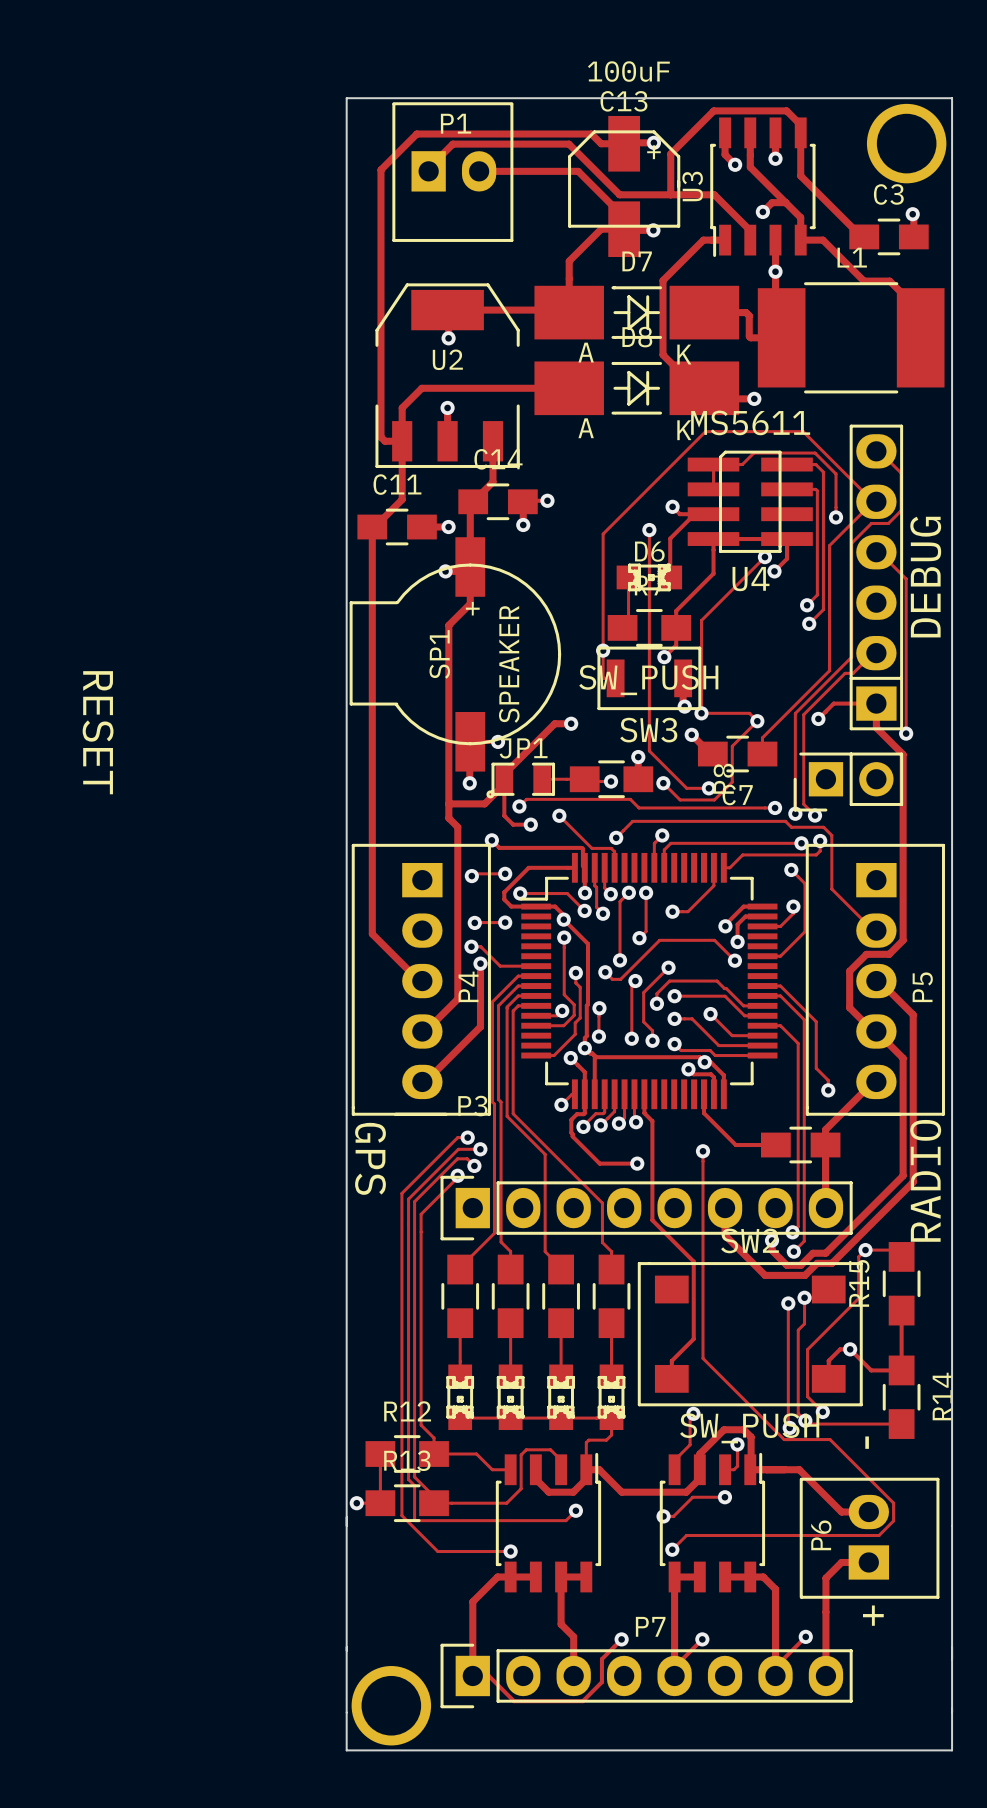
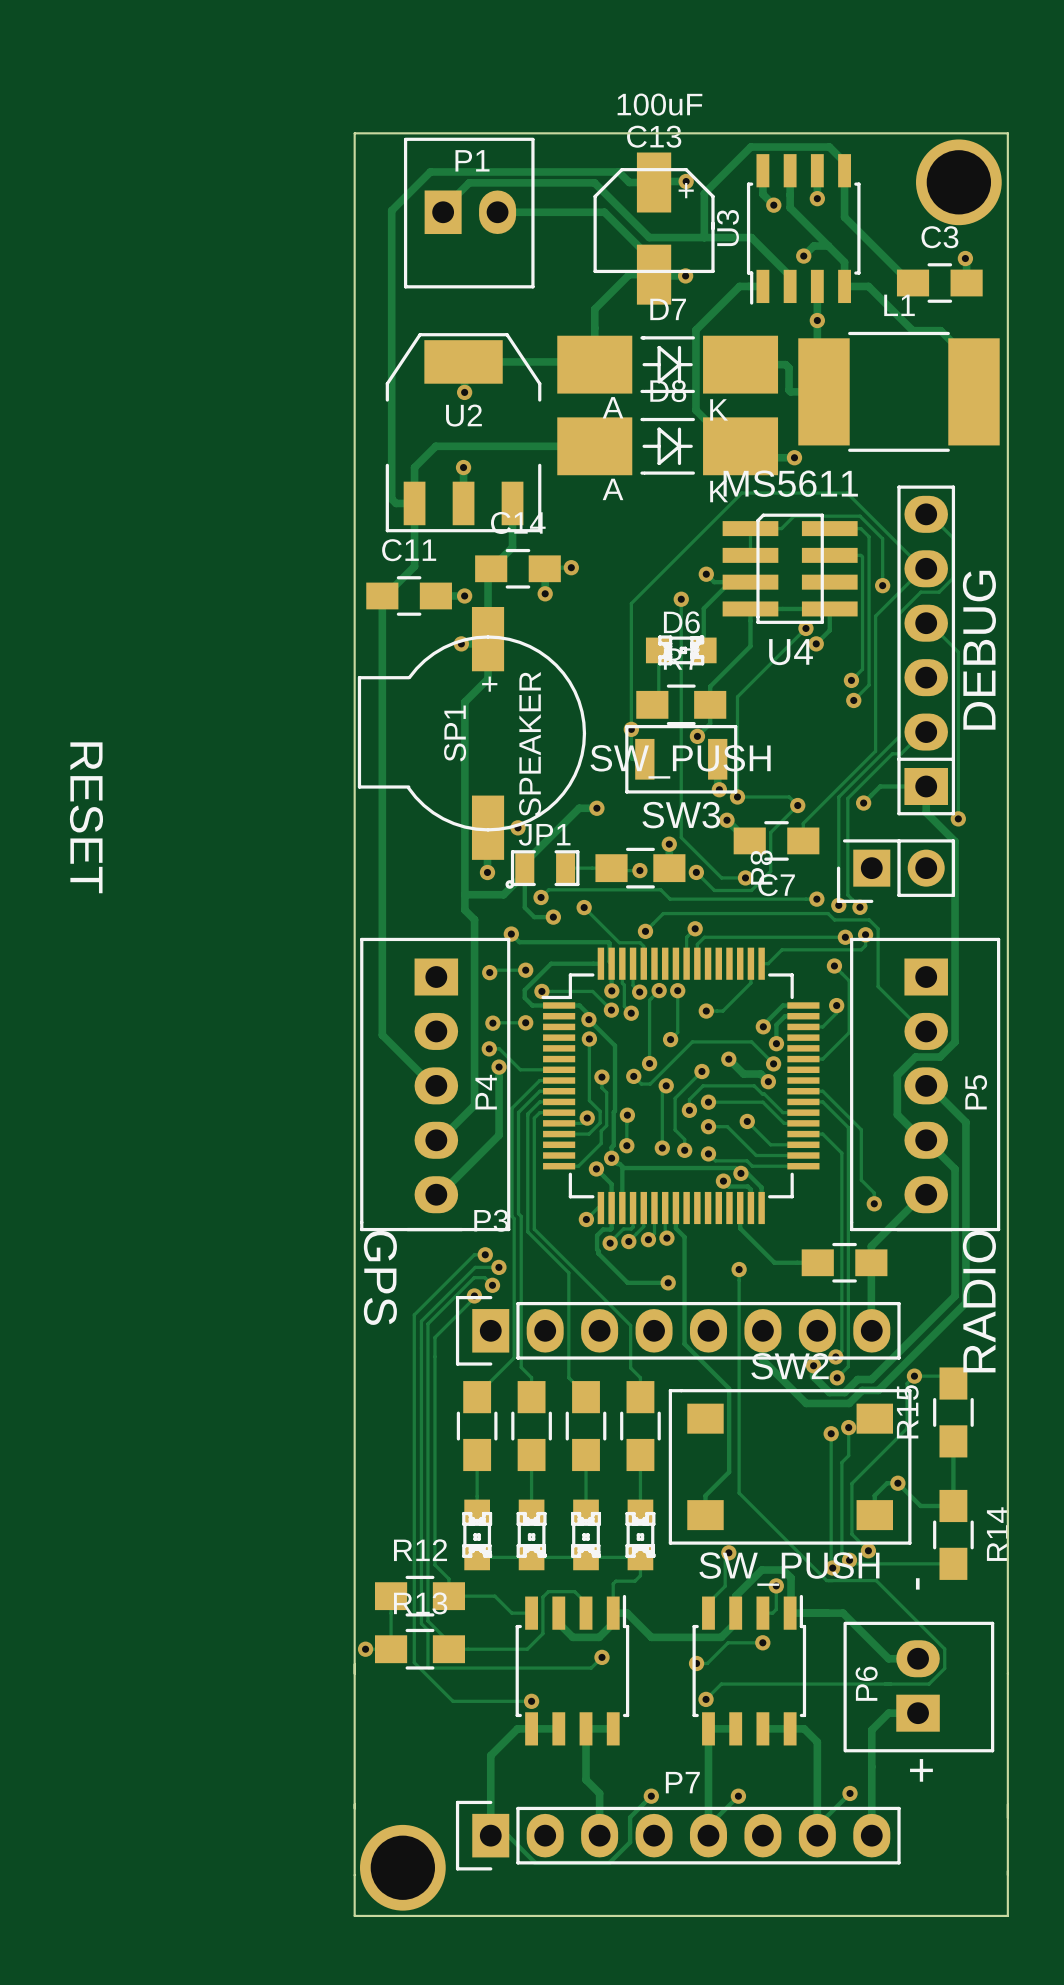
track: none -> (728, 1059) (743, 1074) (760, 1074) (768, 1081)
via: none -> (728, 1059)
via: none -> (768, 1081)

